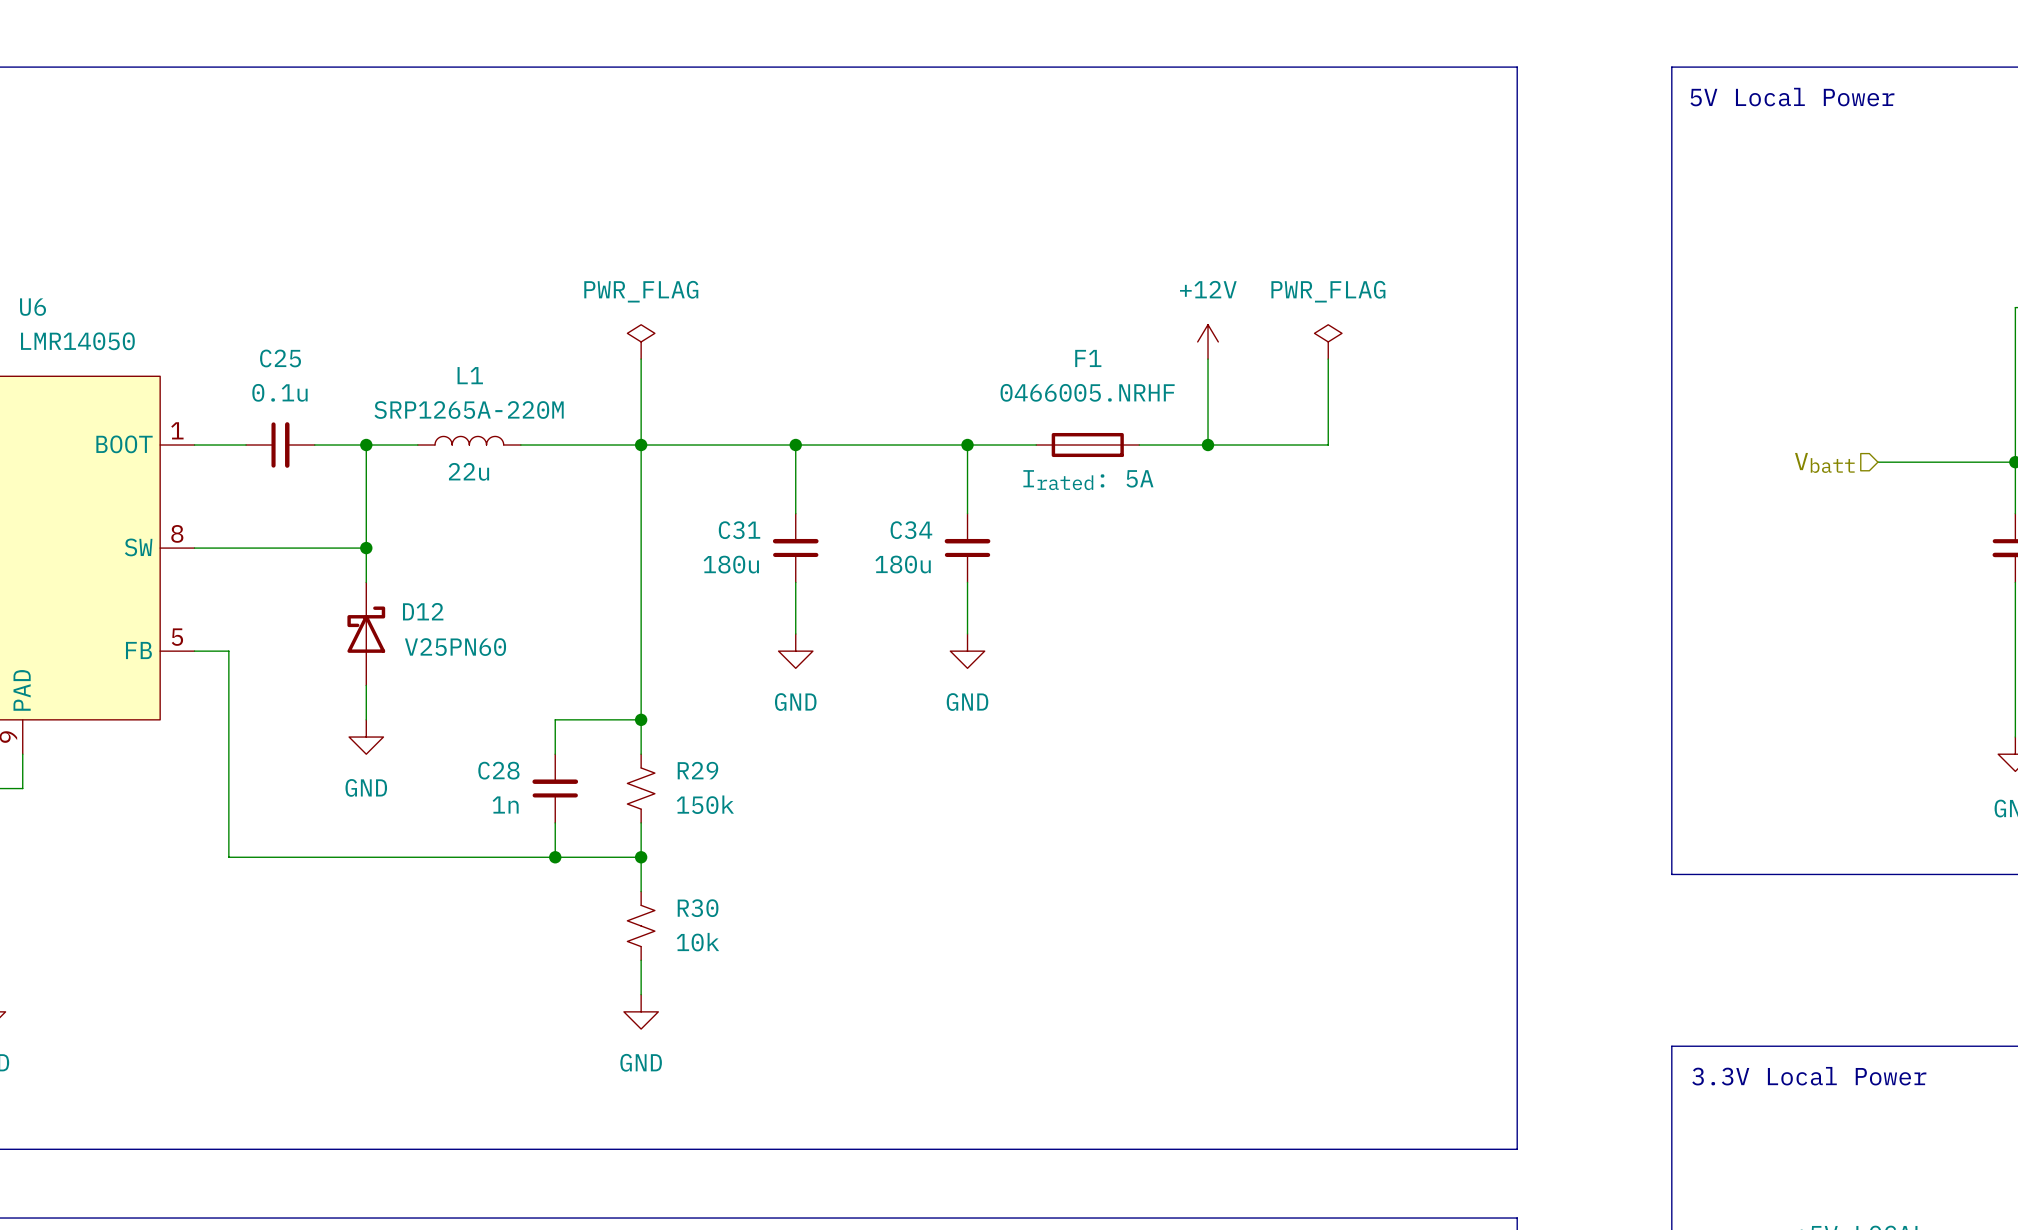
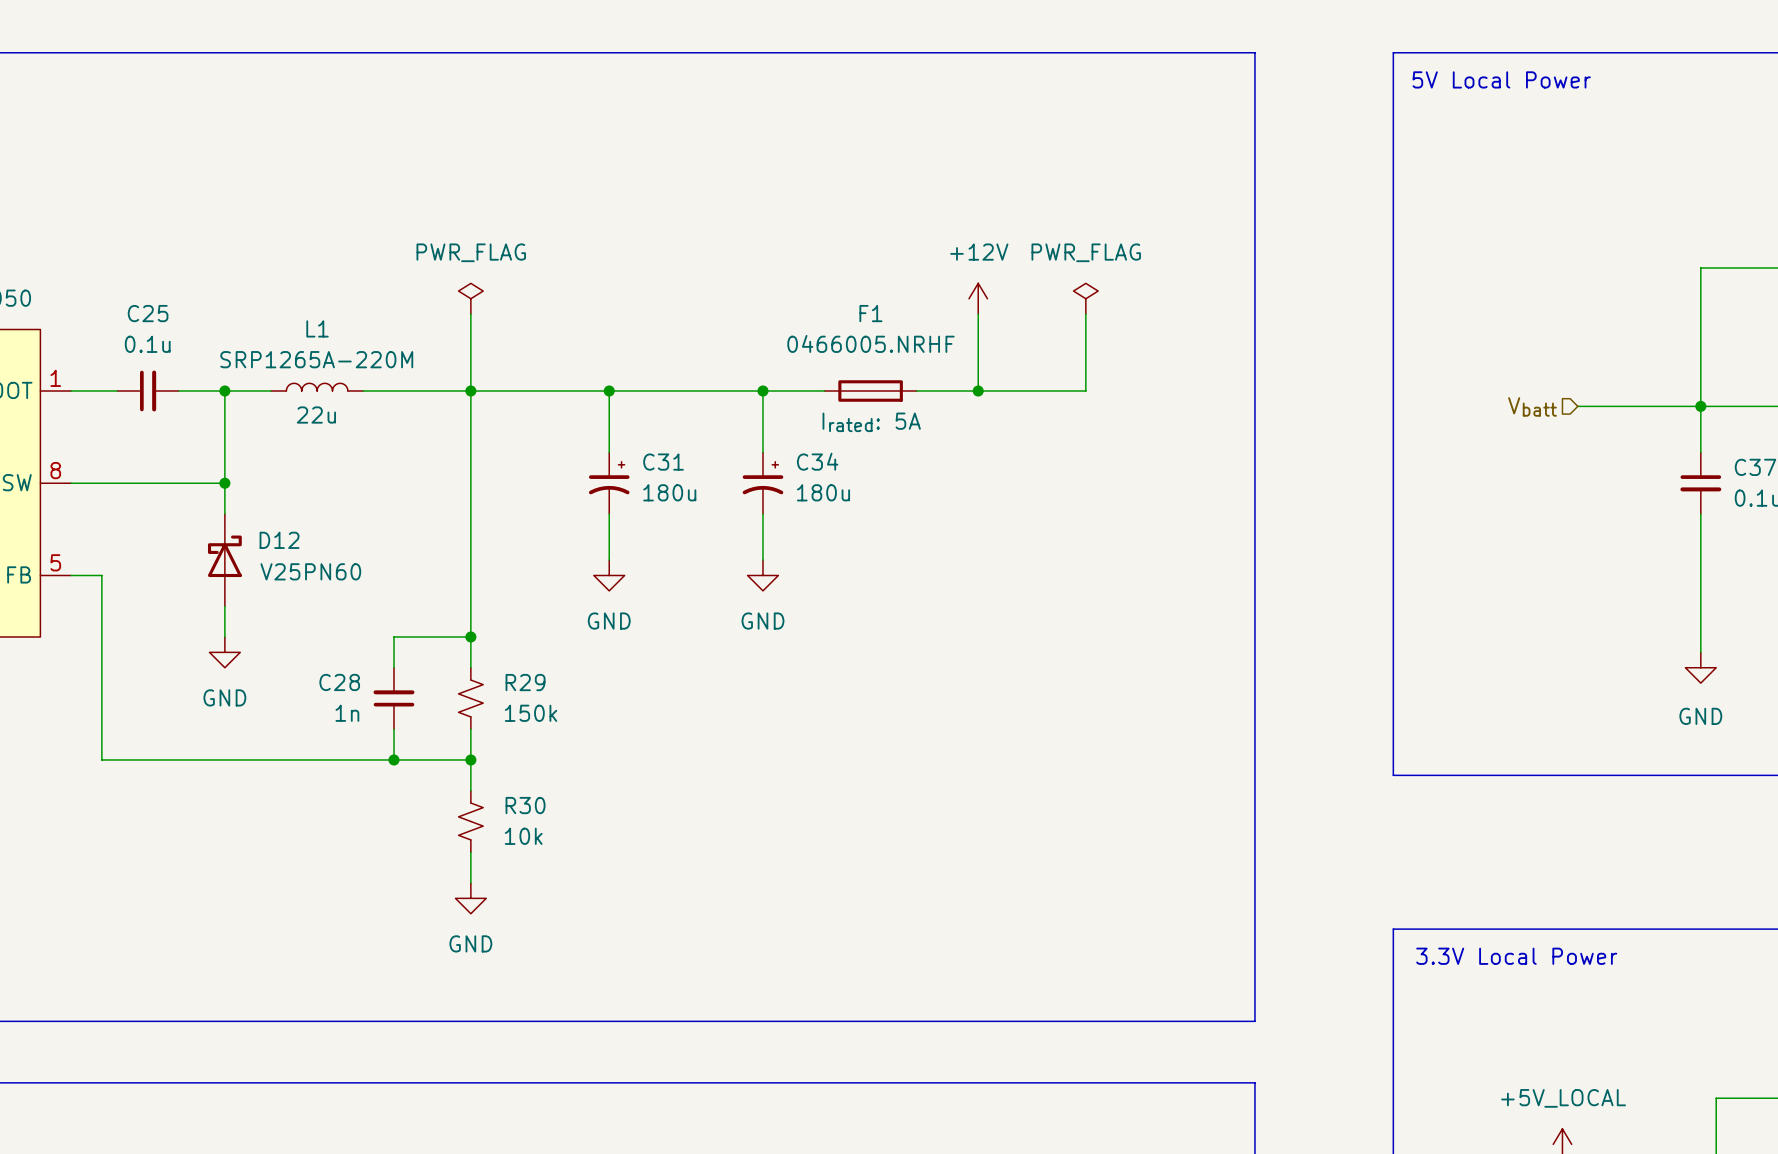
C31 symbol: [772, 513, 819, 583] -> [588, 452, 630, 515]
C34 symbol: [944, 513, 991, 583] -> [742, 452, 784, 515]
C31 name position: C31 (739, 530) -> C31 (663, 462)
C34 name position: C34 (911, 530) -> C34 (817, 461)
C31 value position: 180u (731, 564) -> 180u (669, 492)
C34 value position: 180u (903, 564) -> 180u (823, 492)

